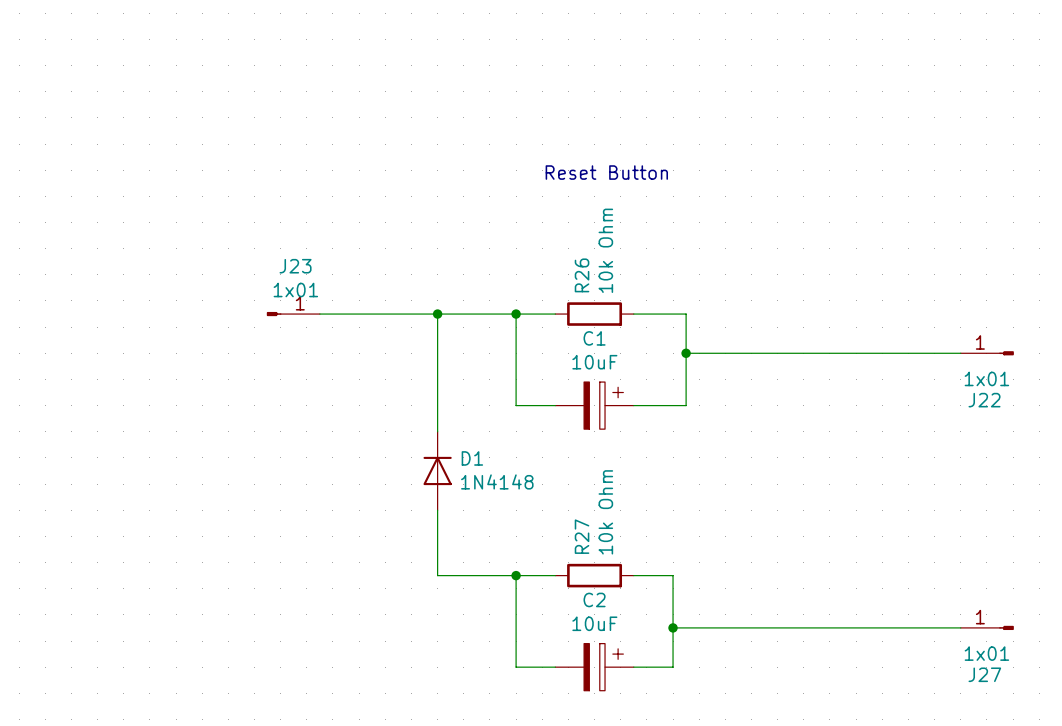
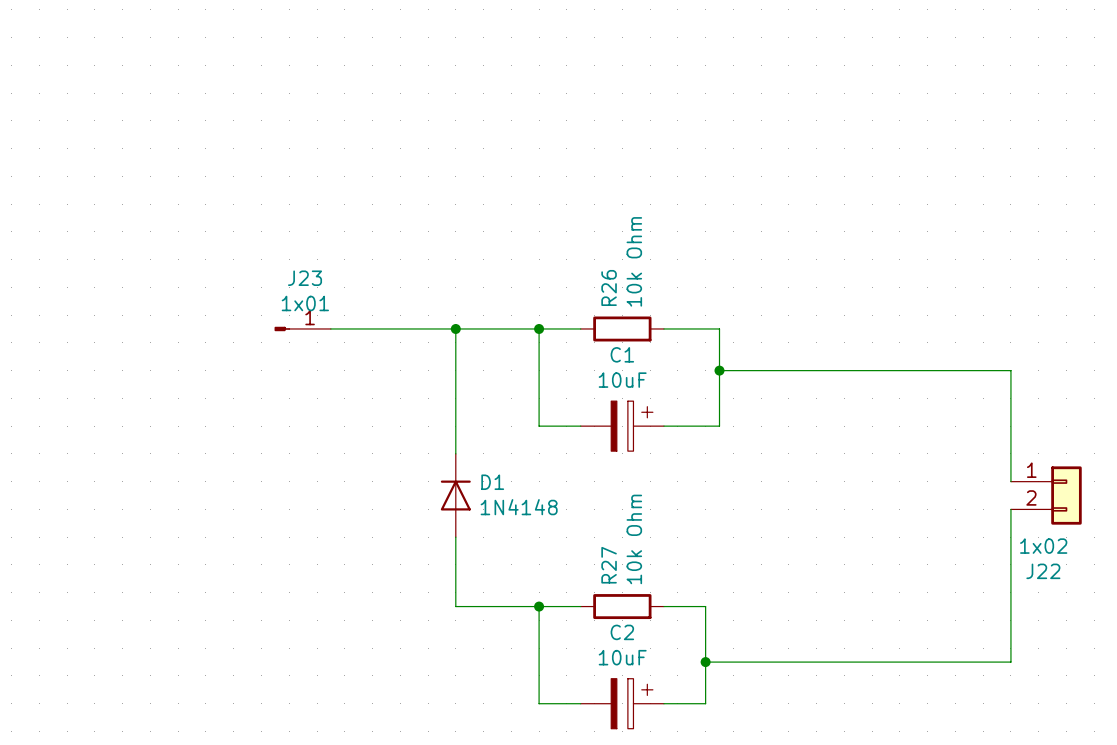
text: Reset Button (606, 172) -> none
J22 symbol: [960, 351, 1014, 356] -> [1010, 466, 1082, 525]
wire: none -> (1010, 370) (1010, 481)
J22 value: 1x01 (986, 378) -> 1x02 (1043, 546)
J22 name position: J22 (984, 400) -> J22 (1043, 571)
wire: none -> (1010, 509) (1010, 662)
J27: 1x01 (987, 627) -> none

